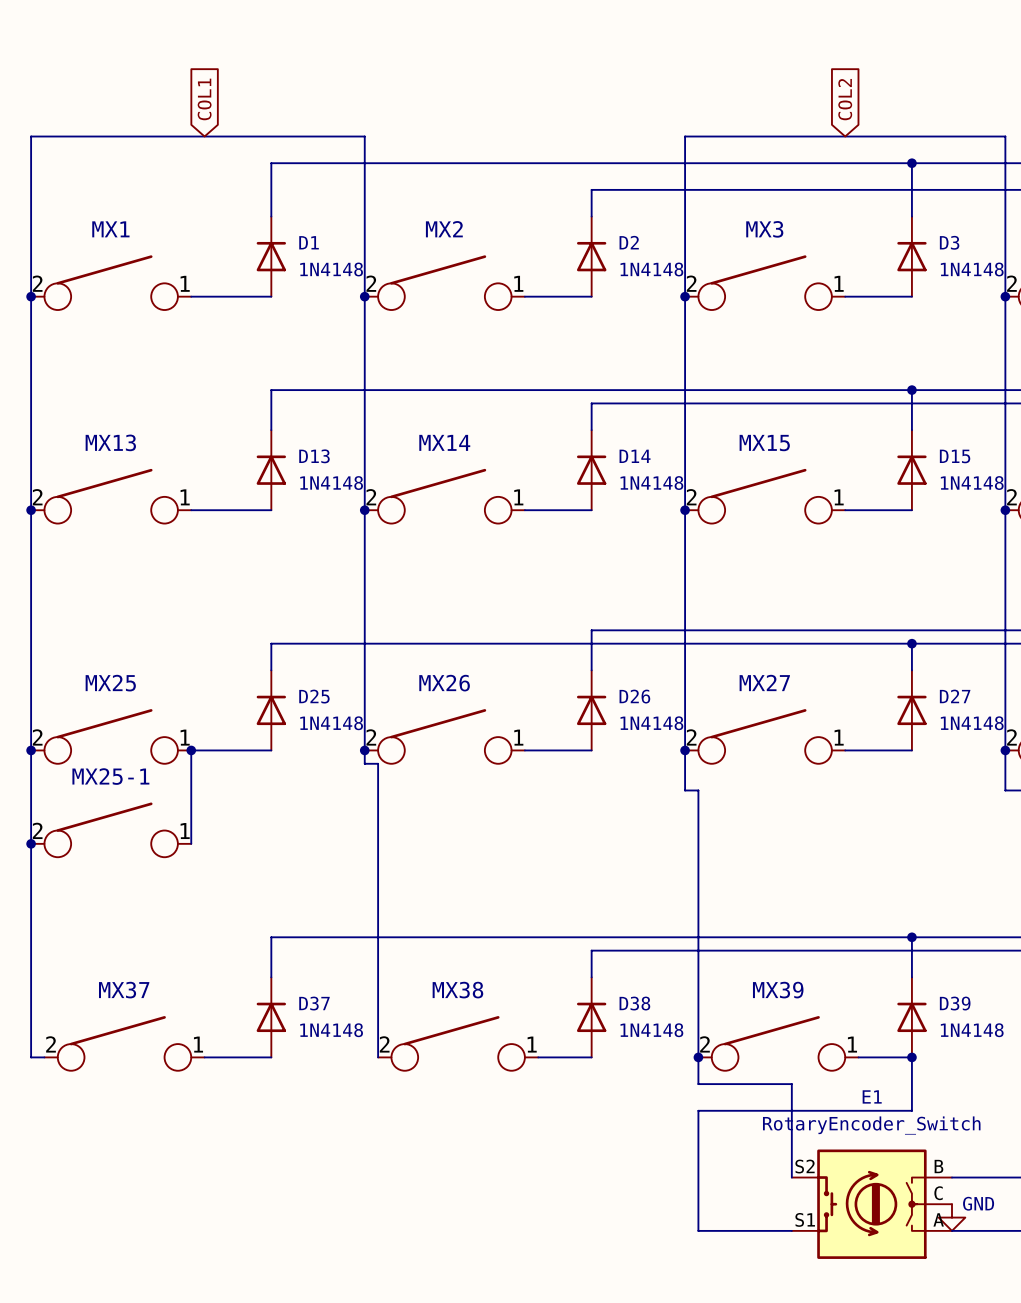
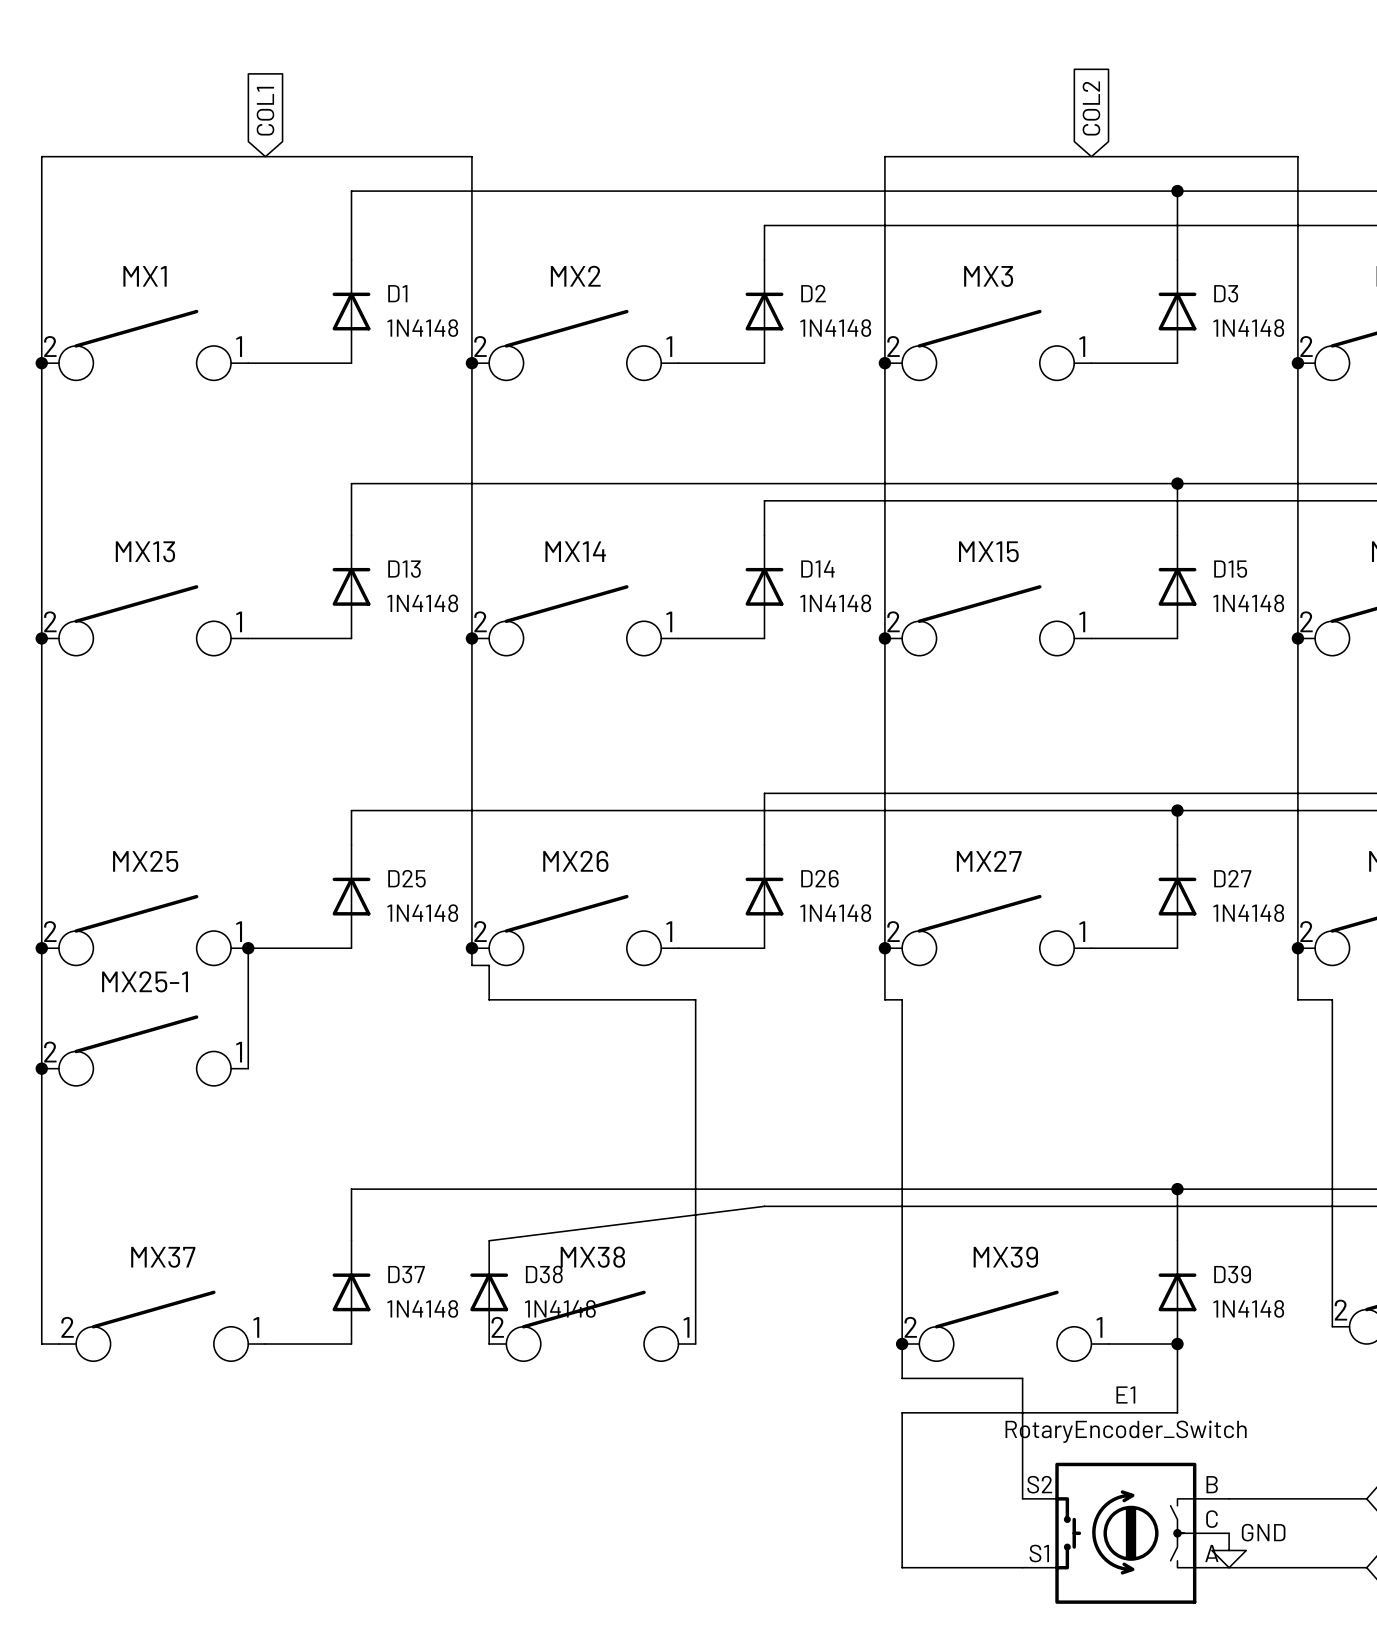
wire: (378, 790) (378, 1057) -> (489, 999) (695, 999) (695, 1344)
wire: (591, 950) (591, 977) -> (764, 1206) (489, 1240)
D38 position: (591, 1017) -> (489, 1292)
wire: (538, 1057) (591, 1057) -> none

